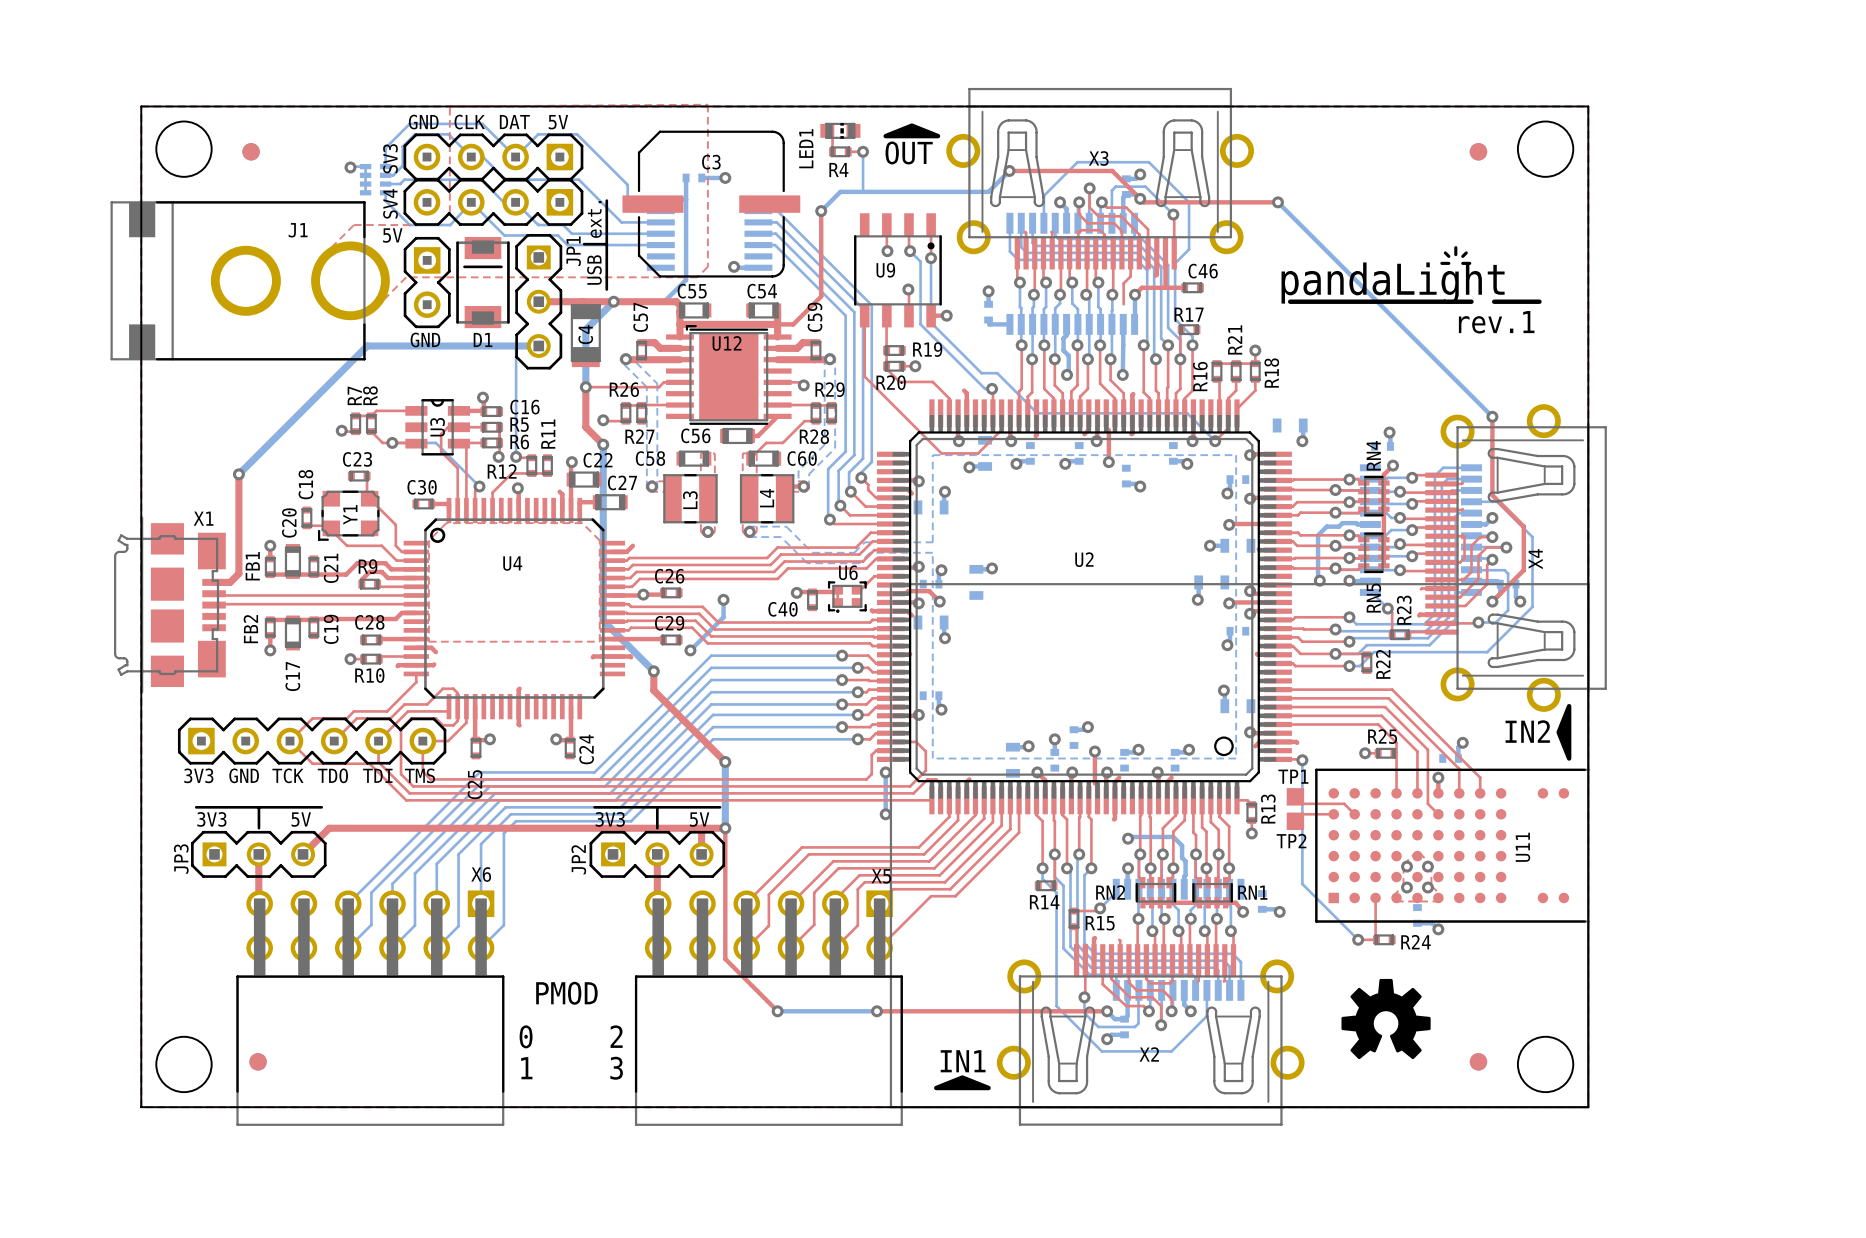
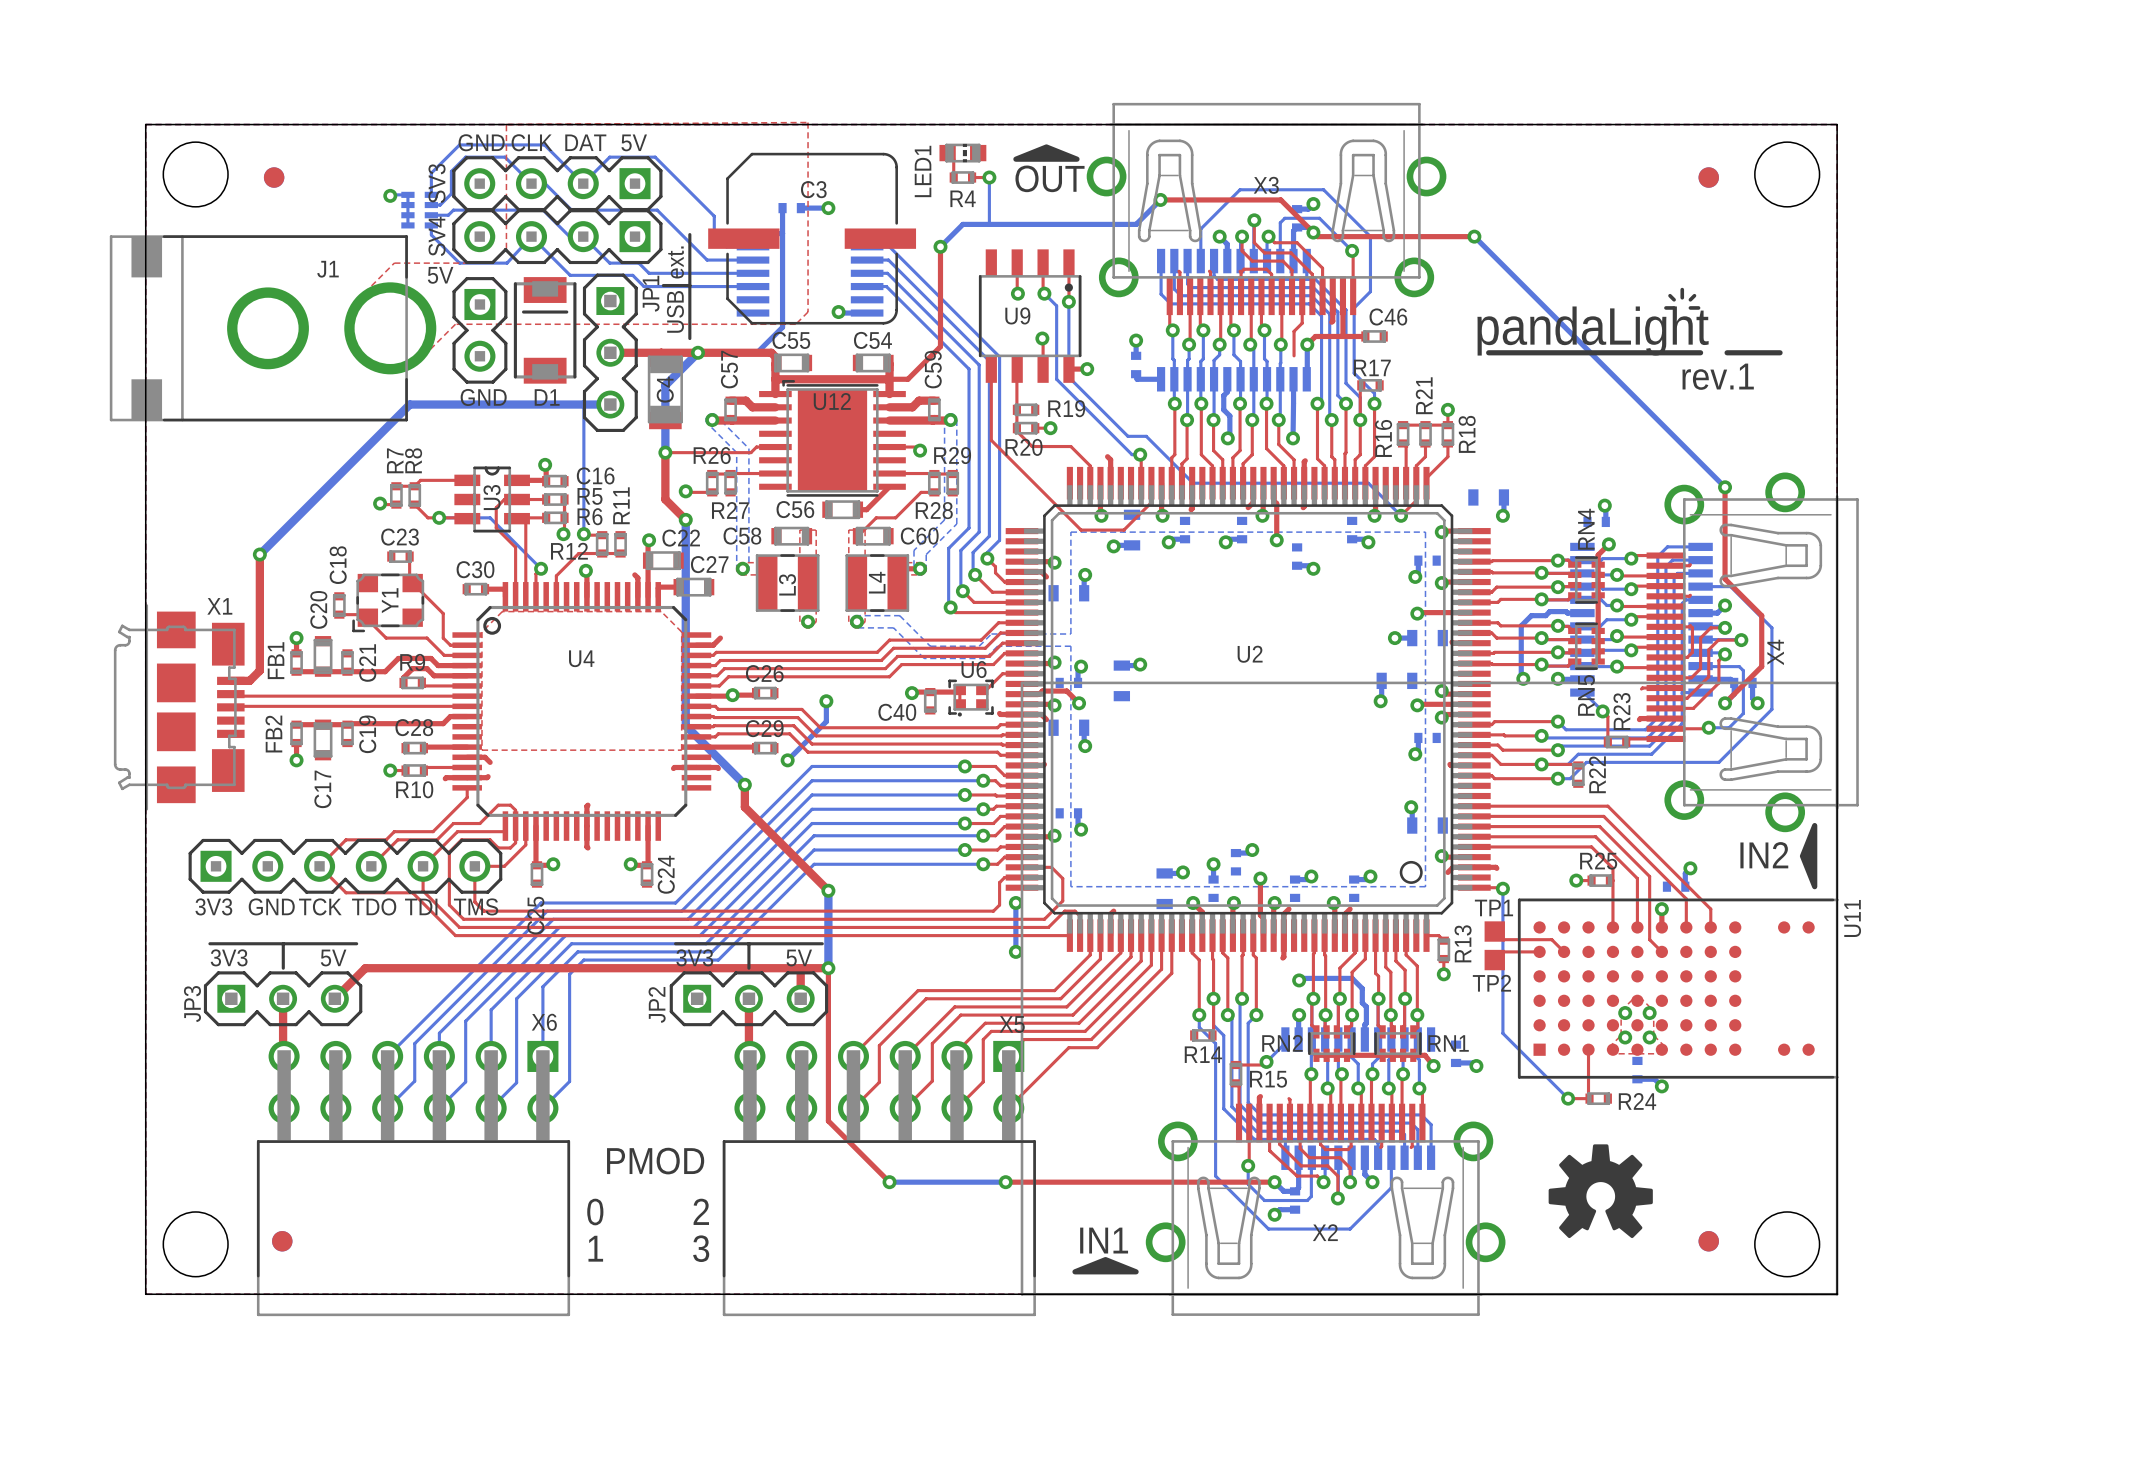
U11 name position: U11 (1522, 847) -> U11 (1852, 918)

